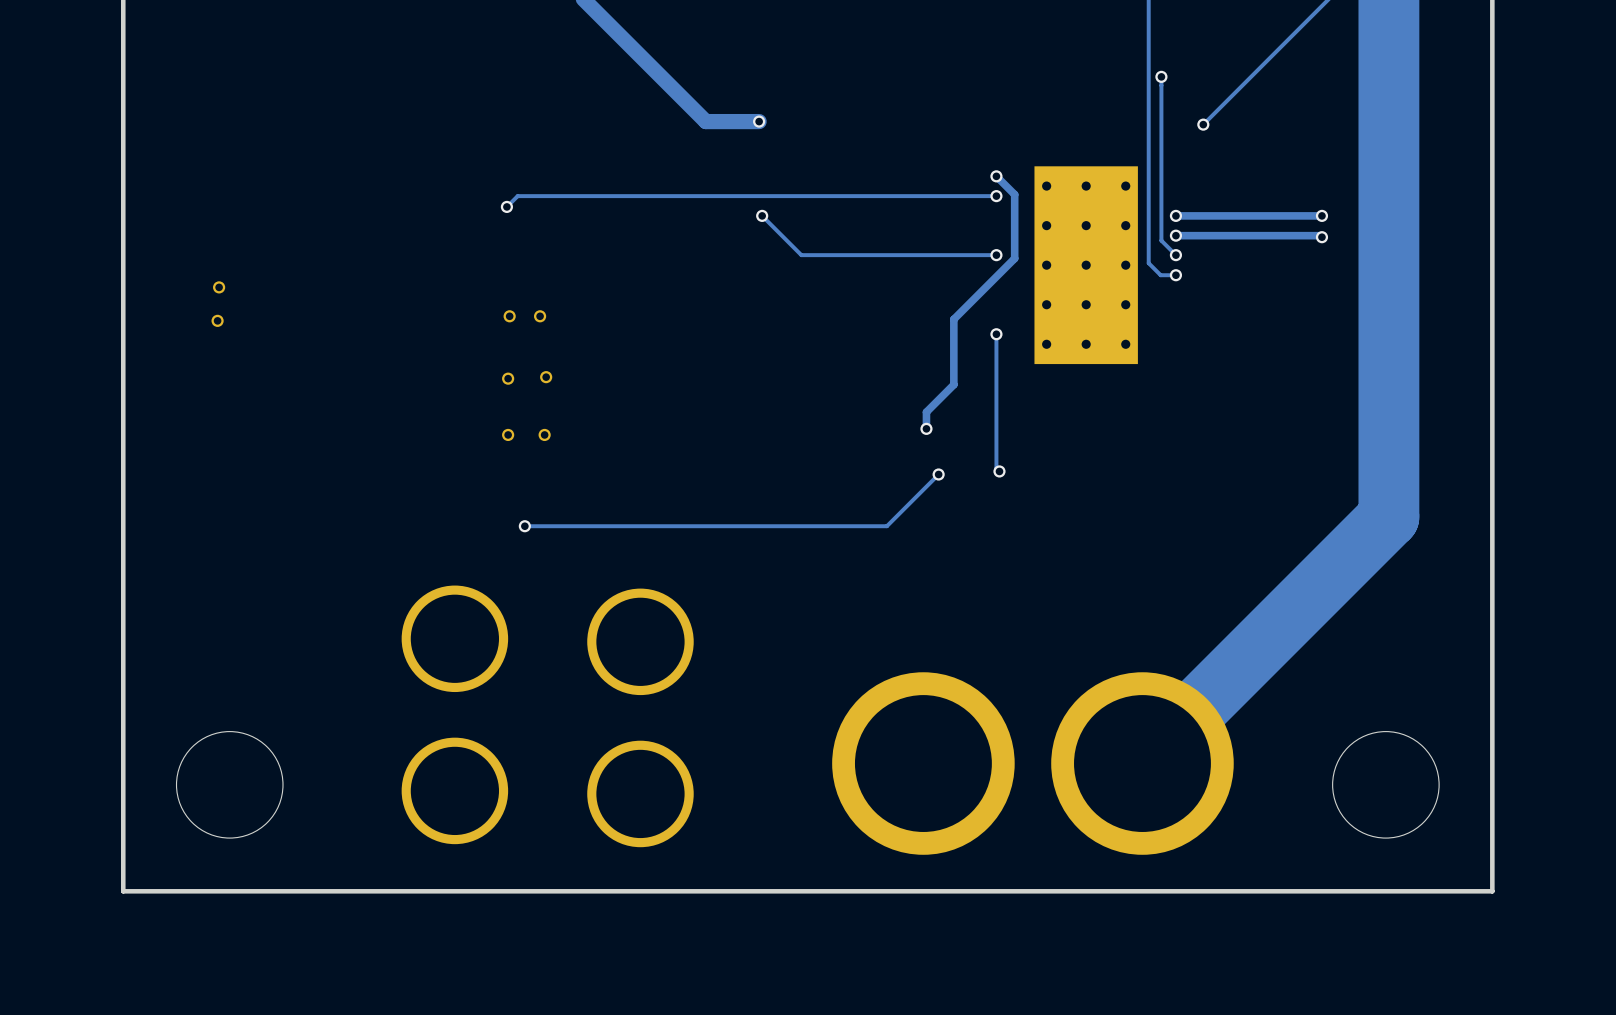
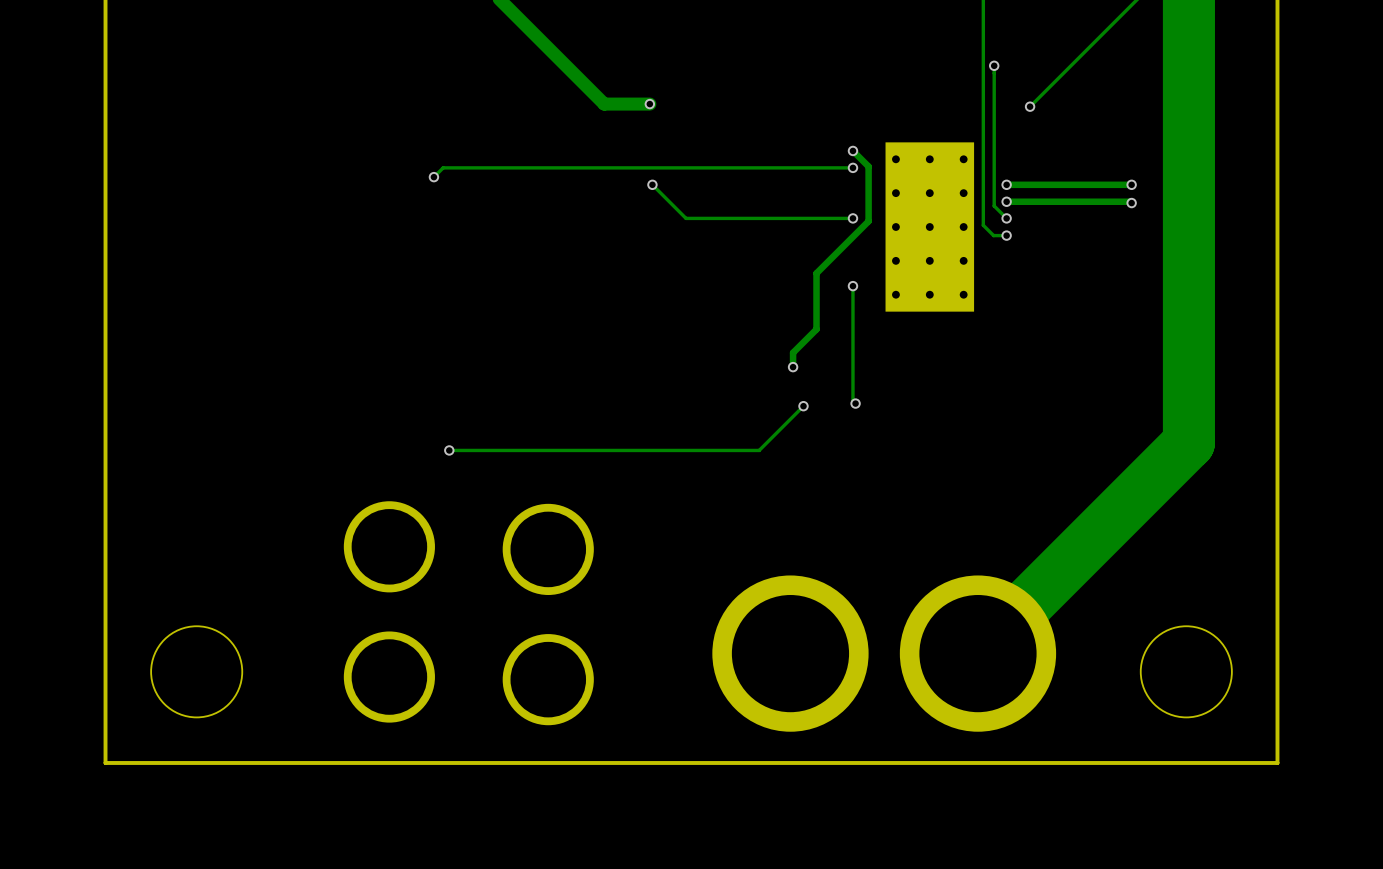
part: (219, 287) -> none
part: (509, 316) -> none
part: (540, 316) -> none
part: (217, 320) -> none
part: (546, 377) -> none
part: (508, 378) -> none
part: (508, 434) -> none
part: (544, 434) -> none

